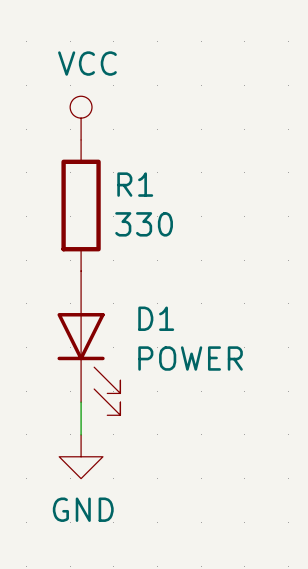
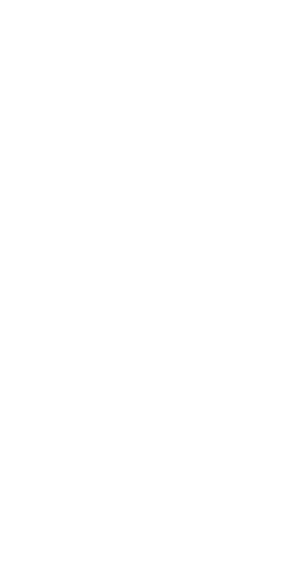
power symbol: VCC (81, 118) -> none
R1: 330 (81, 205) -> none
D1: POWER (88, 343) -> none
wire: (81, 402) (81, 434) -> none
power symbol: GND (81, 456) -> none

